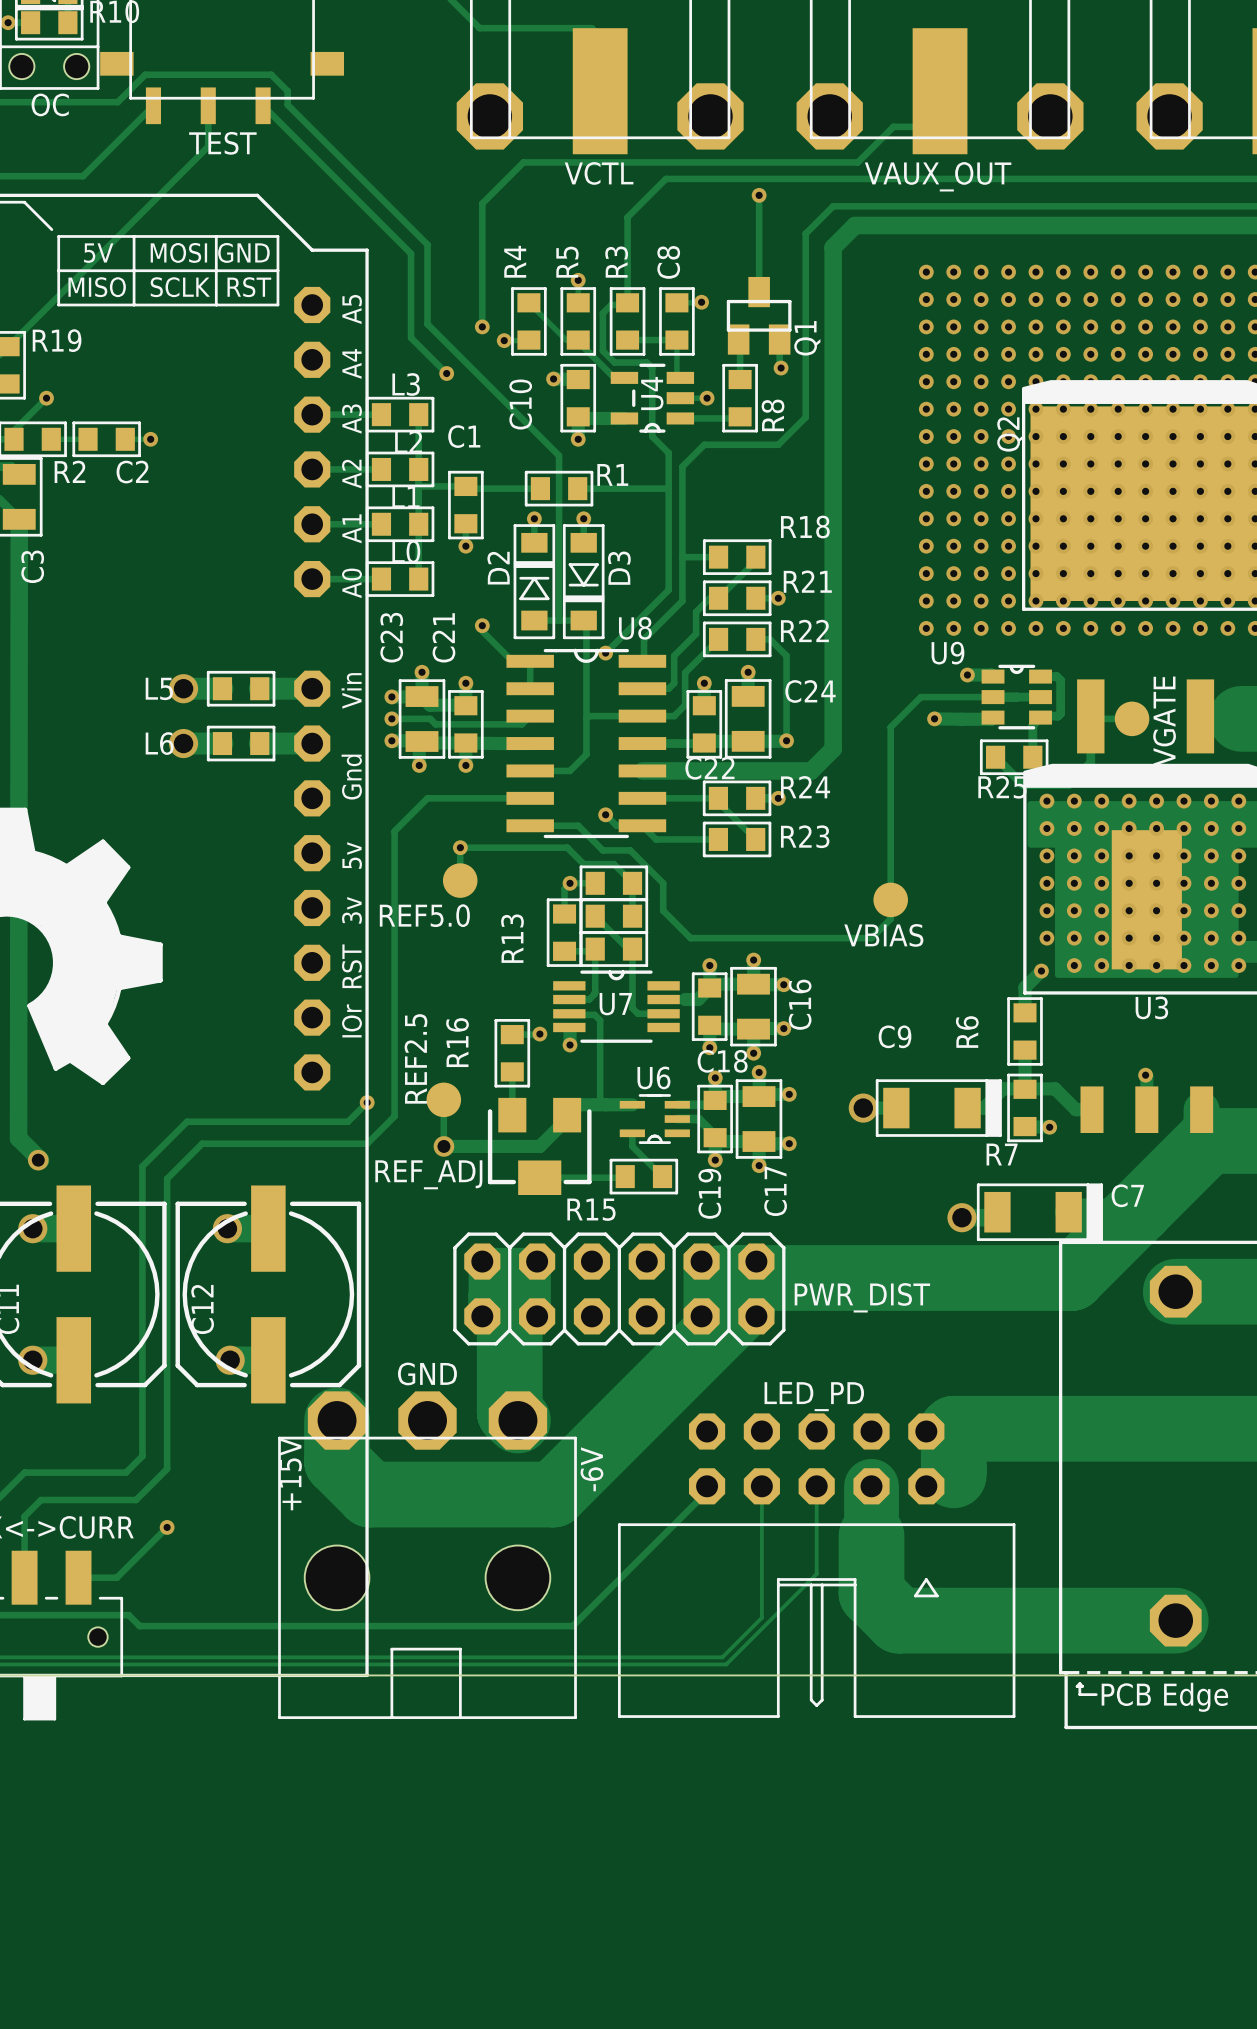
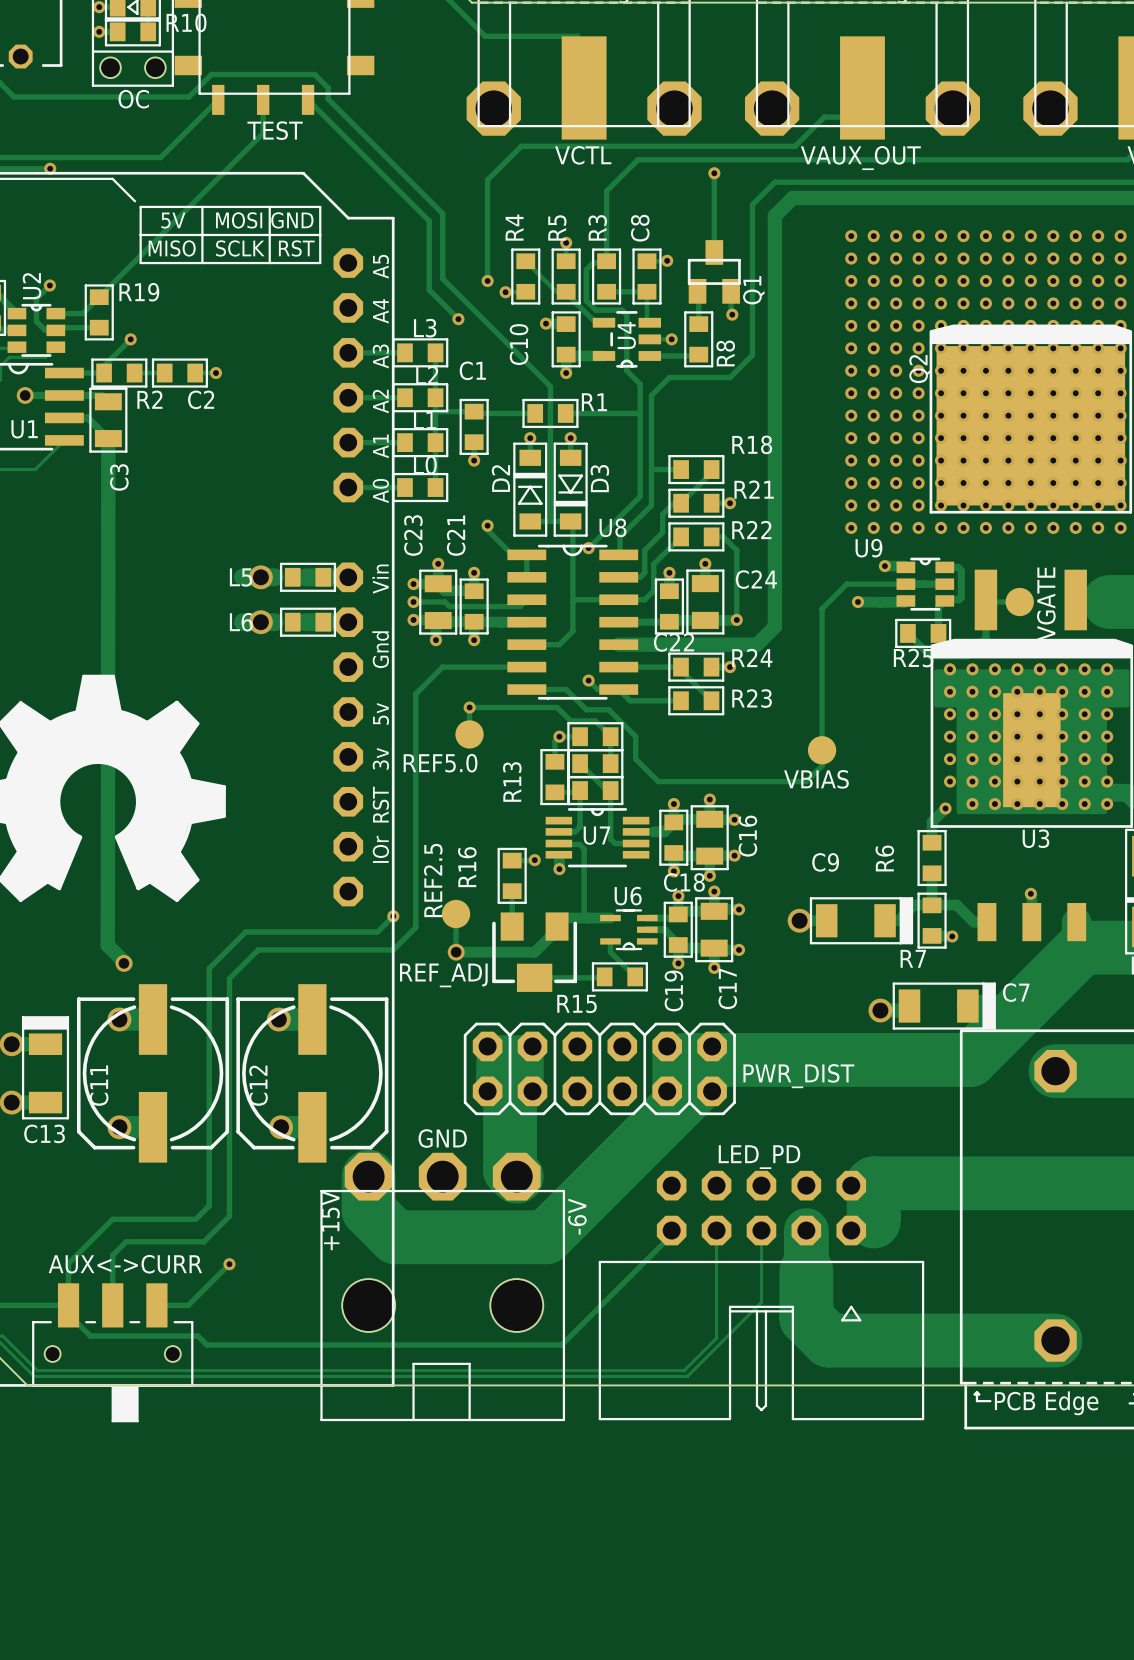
via position: (183, 688) -> (260, 577)
L5 position: (241, 688) -> (308, 577)
via position: (183, 743) -> (260, 622)
L6 position: (241, 743) -> (308, 622)

